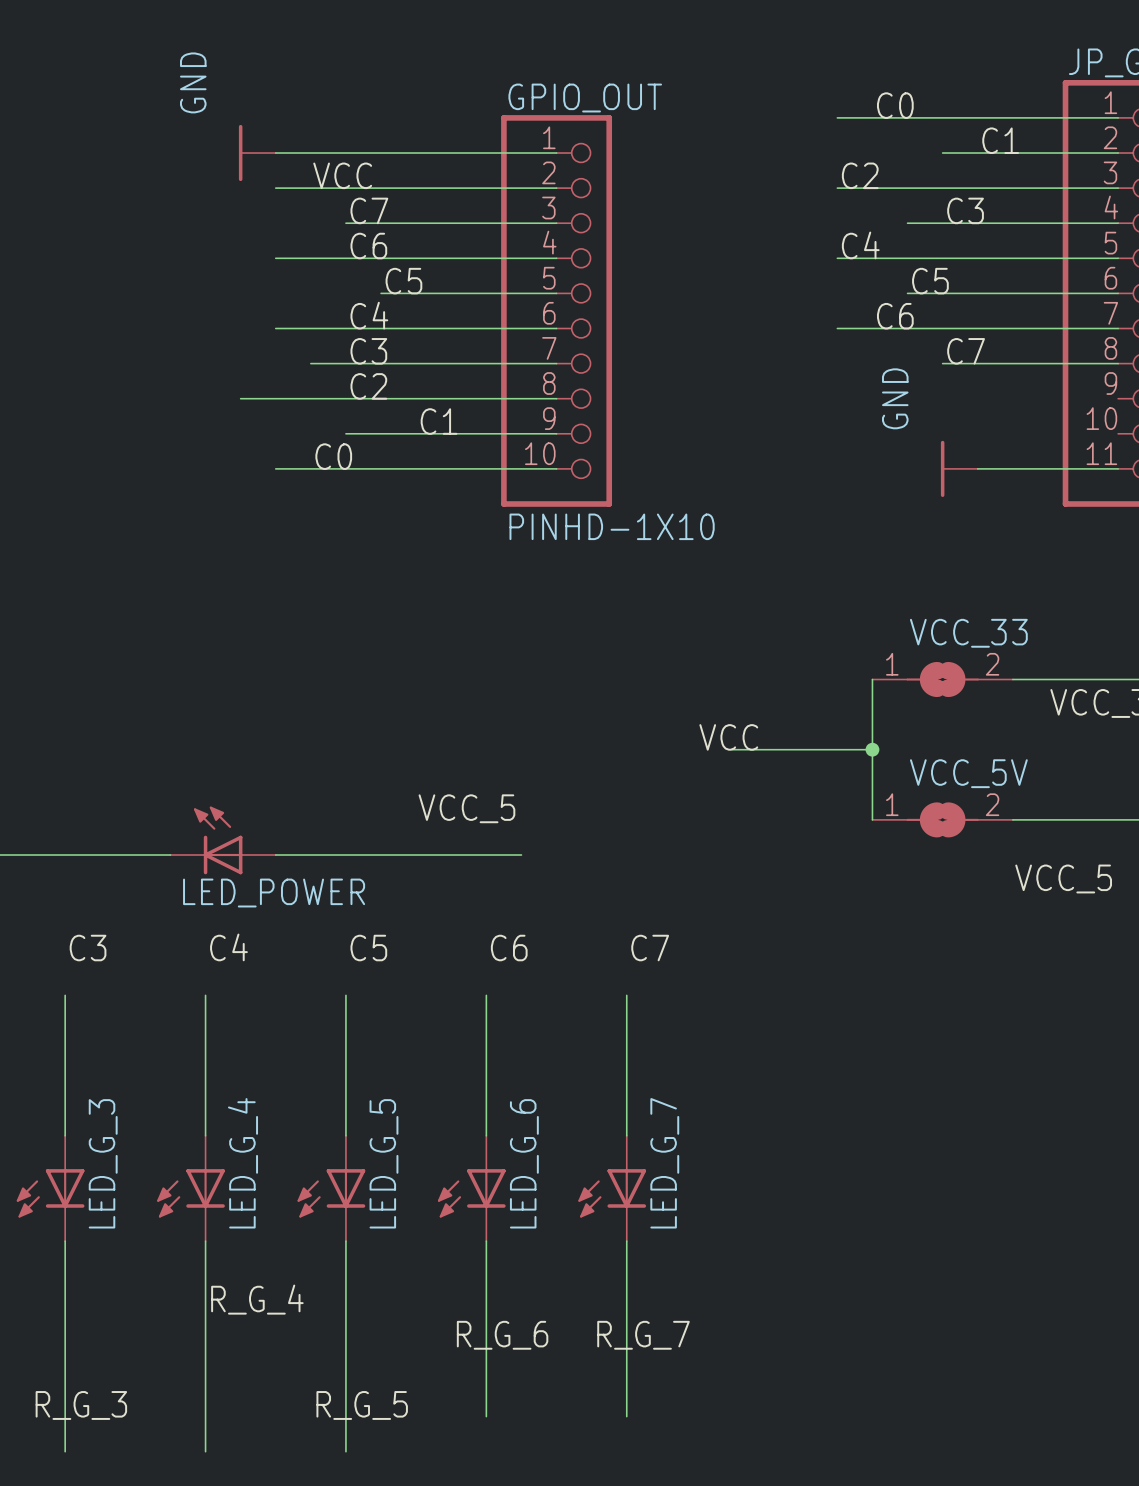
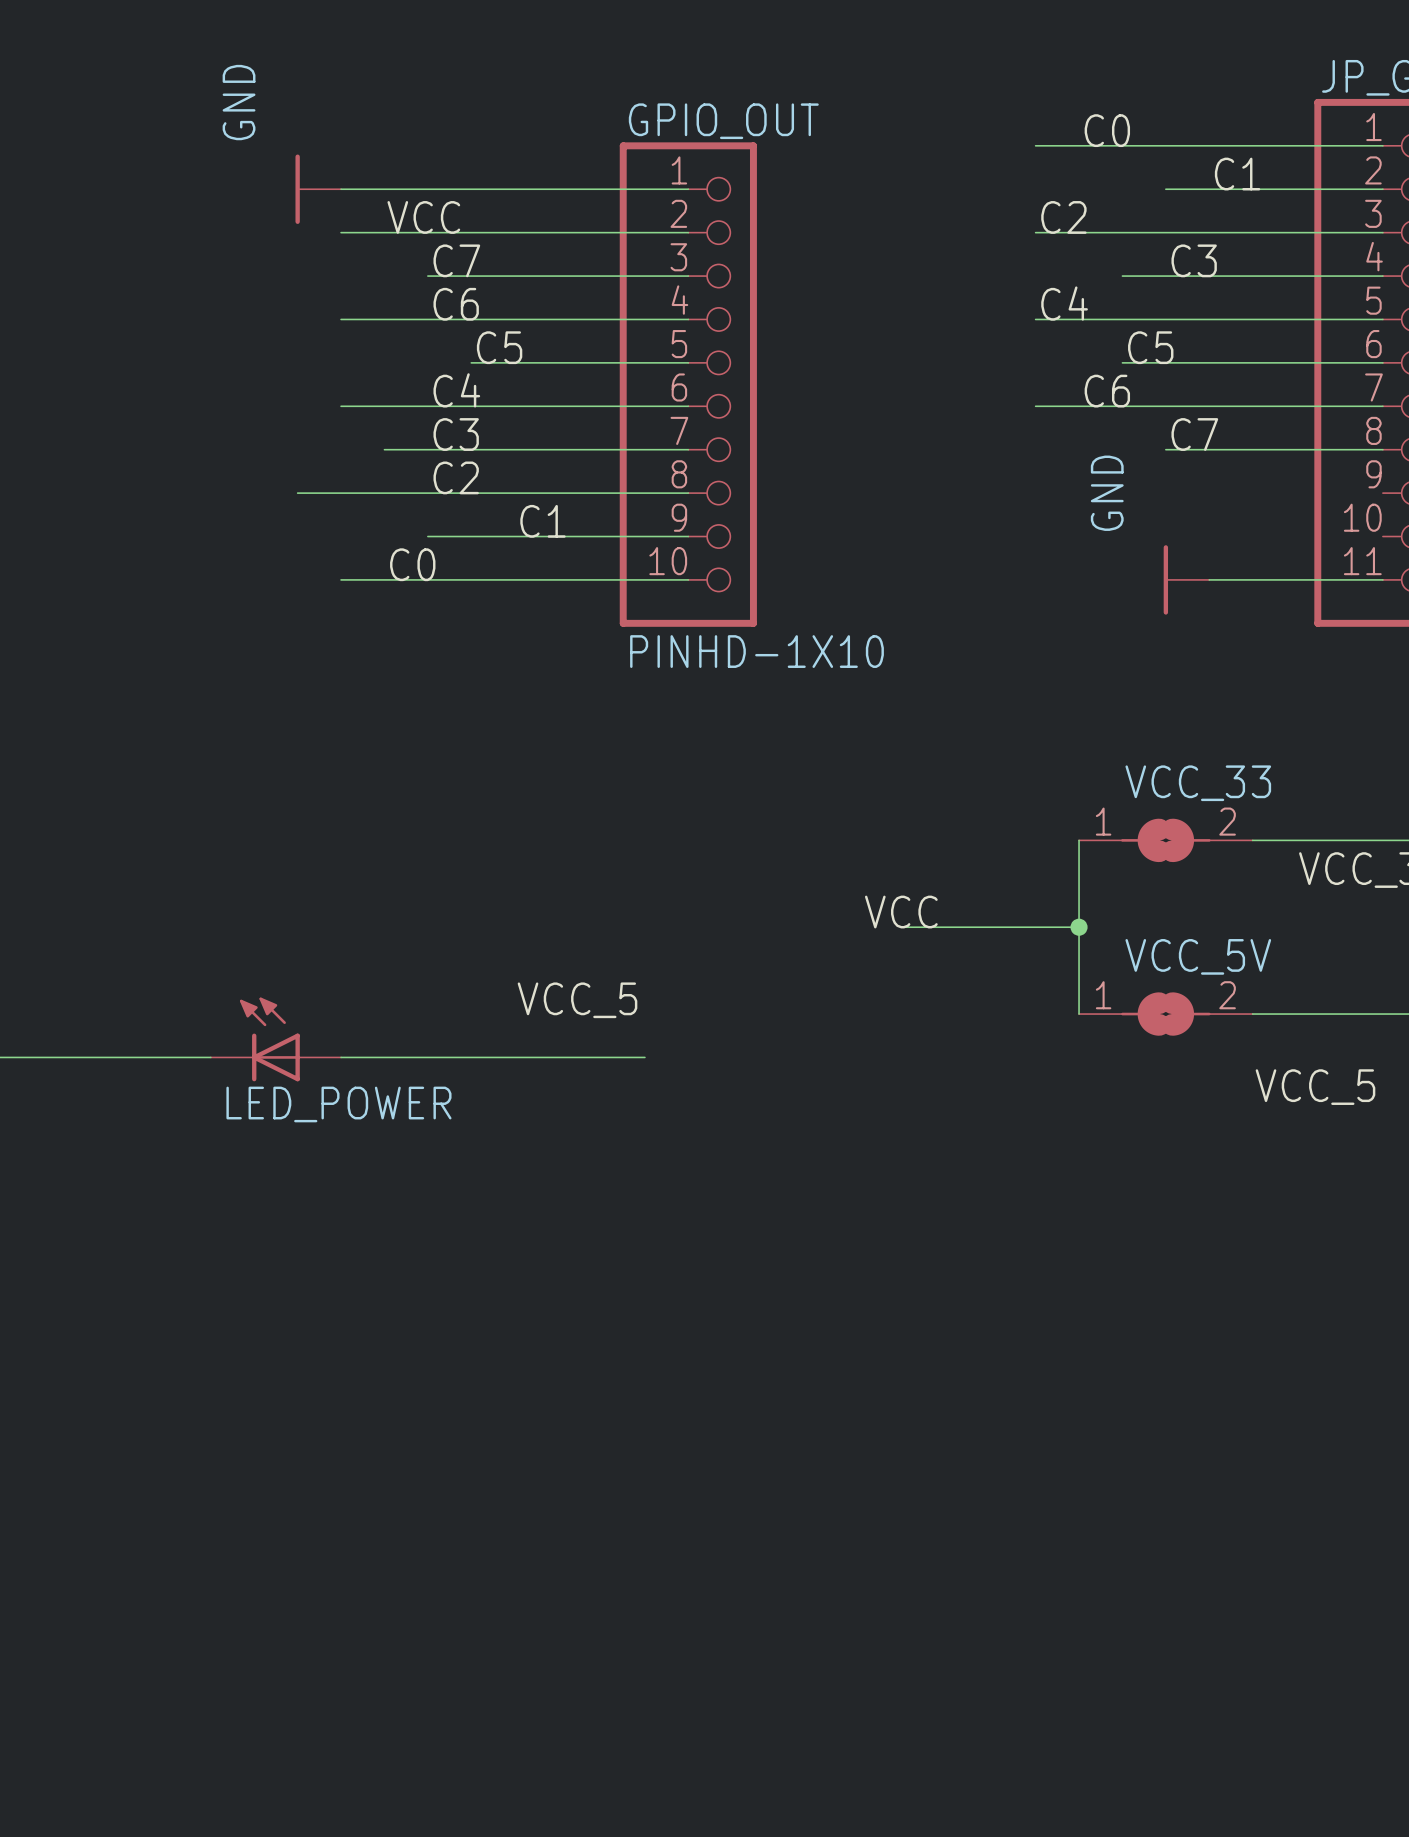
label: C4 (228, 947) -> none
label: C3 (88, 948) -> none
label: C5 (368, 948) -> none
label: C6 (509, 948) -> none
label: C7 (650, 948) -> none
wire: (65, 995) (65, 1135) -> none
wire: (205, 995) (205, 1135) -> none
wire: (345, 995) (345, 1135) -> none
wire: (486, 995) (486, 1135) -> none
wire: (626, 995) (626, 1135) -> none
LED_G_3: (50, 1188) -> none
LED_G_4: (190, 1188) -> none
LED_G_5: (331, 1188) -> none
LED_G_6: (471, 1188) -> none
LED_G_7: (612, 1188) -> none
wire: (65, 1241) (65, 1451) -> none
wire: (205, 1241) (205, 1451) -> none
wire: (345, 1241) (345, 1451) -> none
wire: (486, 1241) (486, 1416) -> none
wire: (626, 1241) (626, 1416) -> none
label: R_G_4 (257, 1299) -> none
label: R_G_6 (502, 1335) -> none
label: R_G_7 (643, 1335) -> none
label: R_G_3 (81, 1405) -> none
label: R_G_5 (362, 1405) -> none

